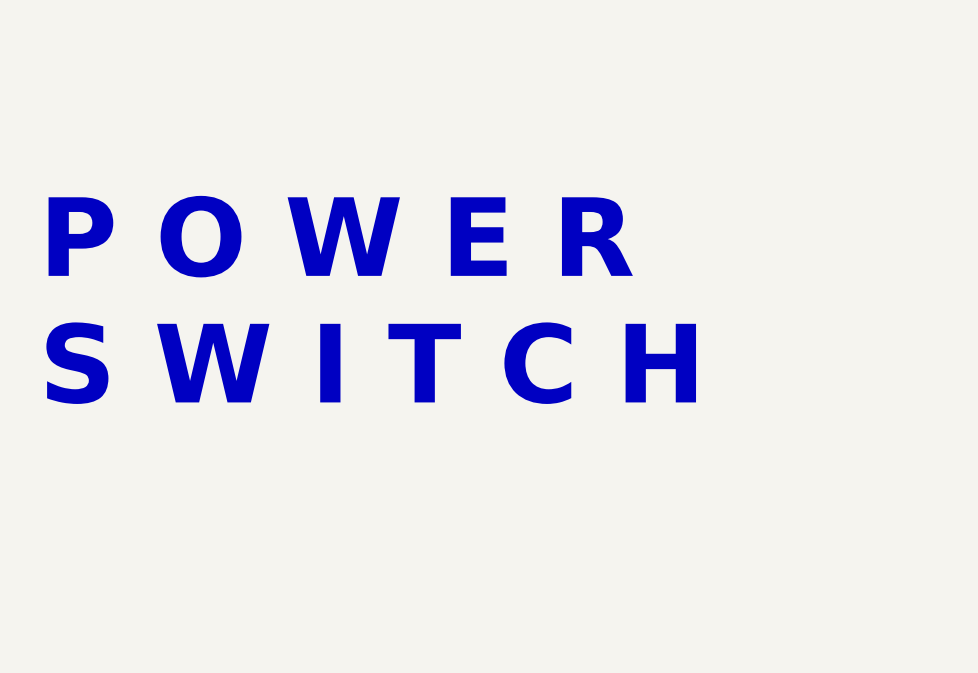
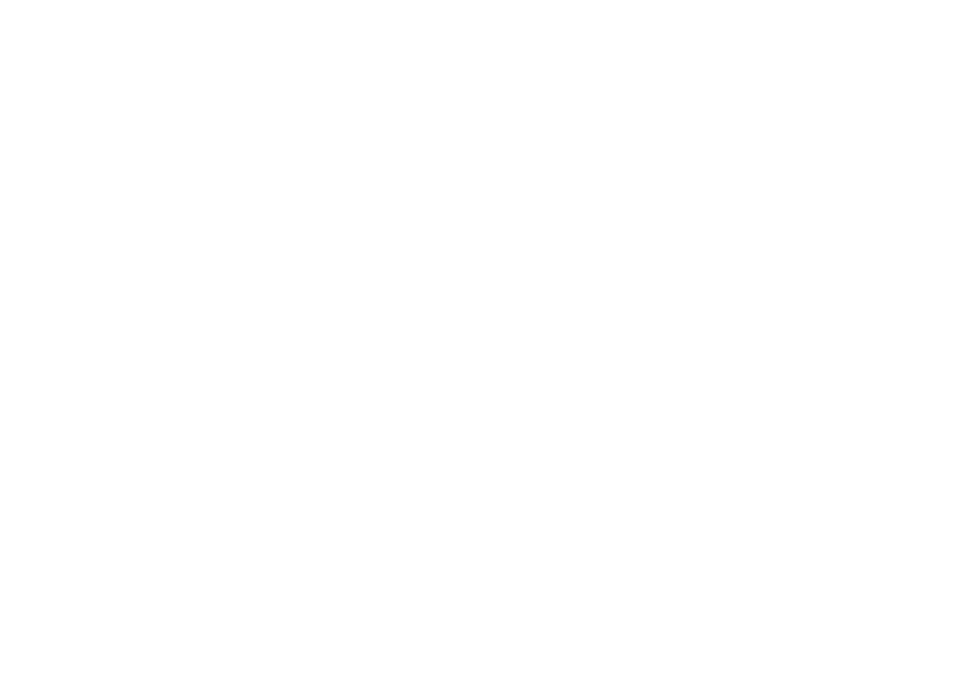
text: P O W E R (340, 236) -> none
text: S W I T C H (371, 363) -> none

